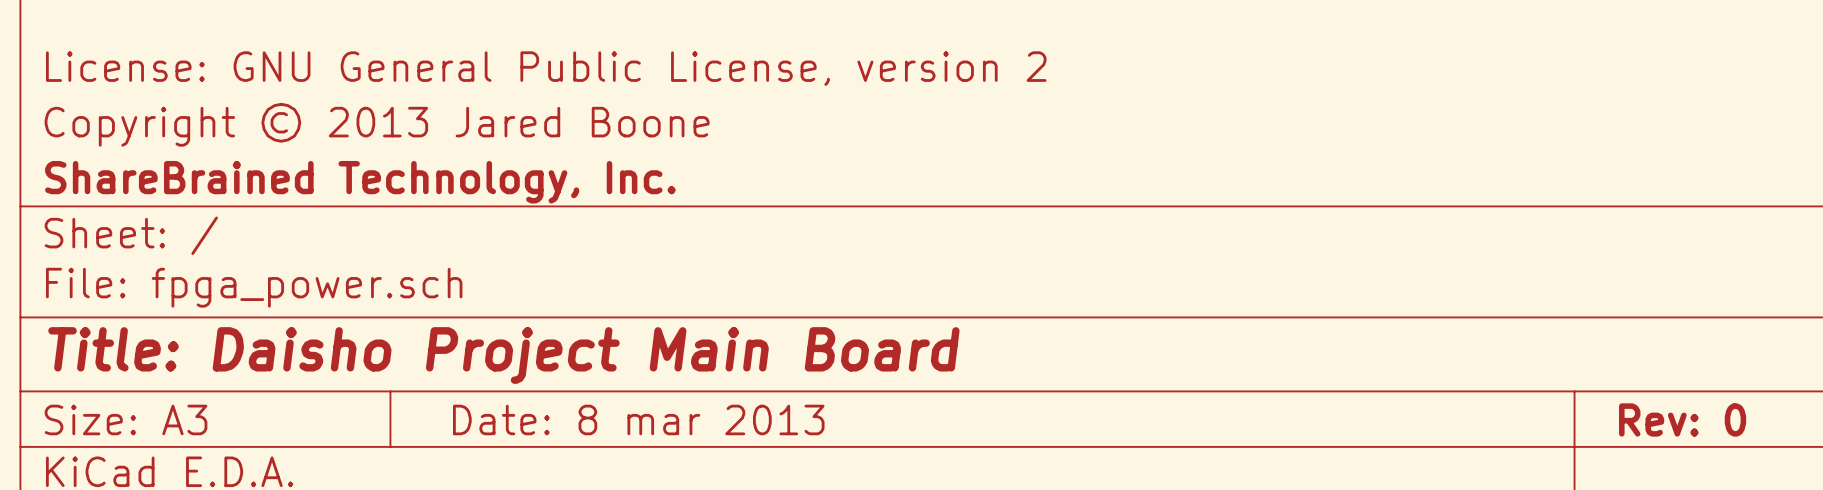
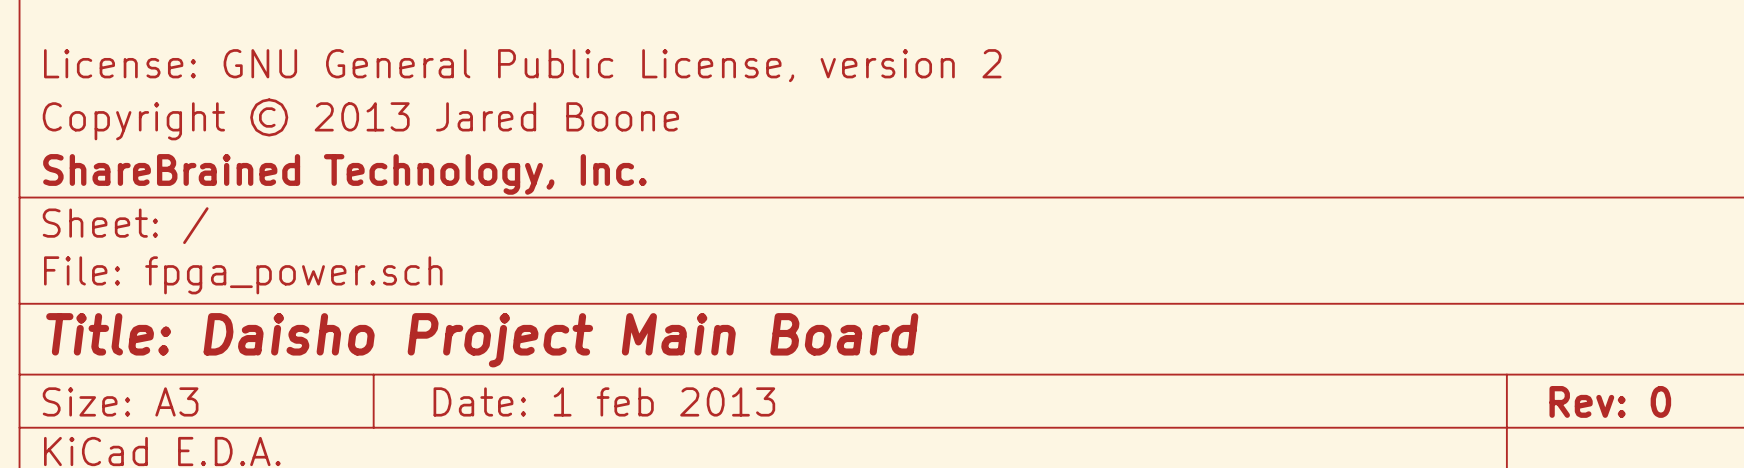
title block: Date: 8 mar 2013 (638, 419) -> Date: 1 feb 2013 (604, 401)

